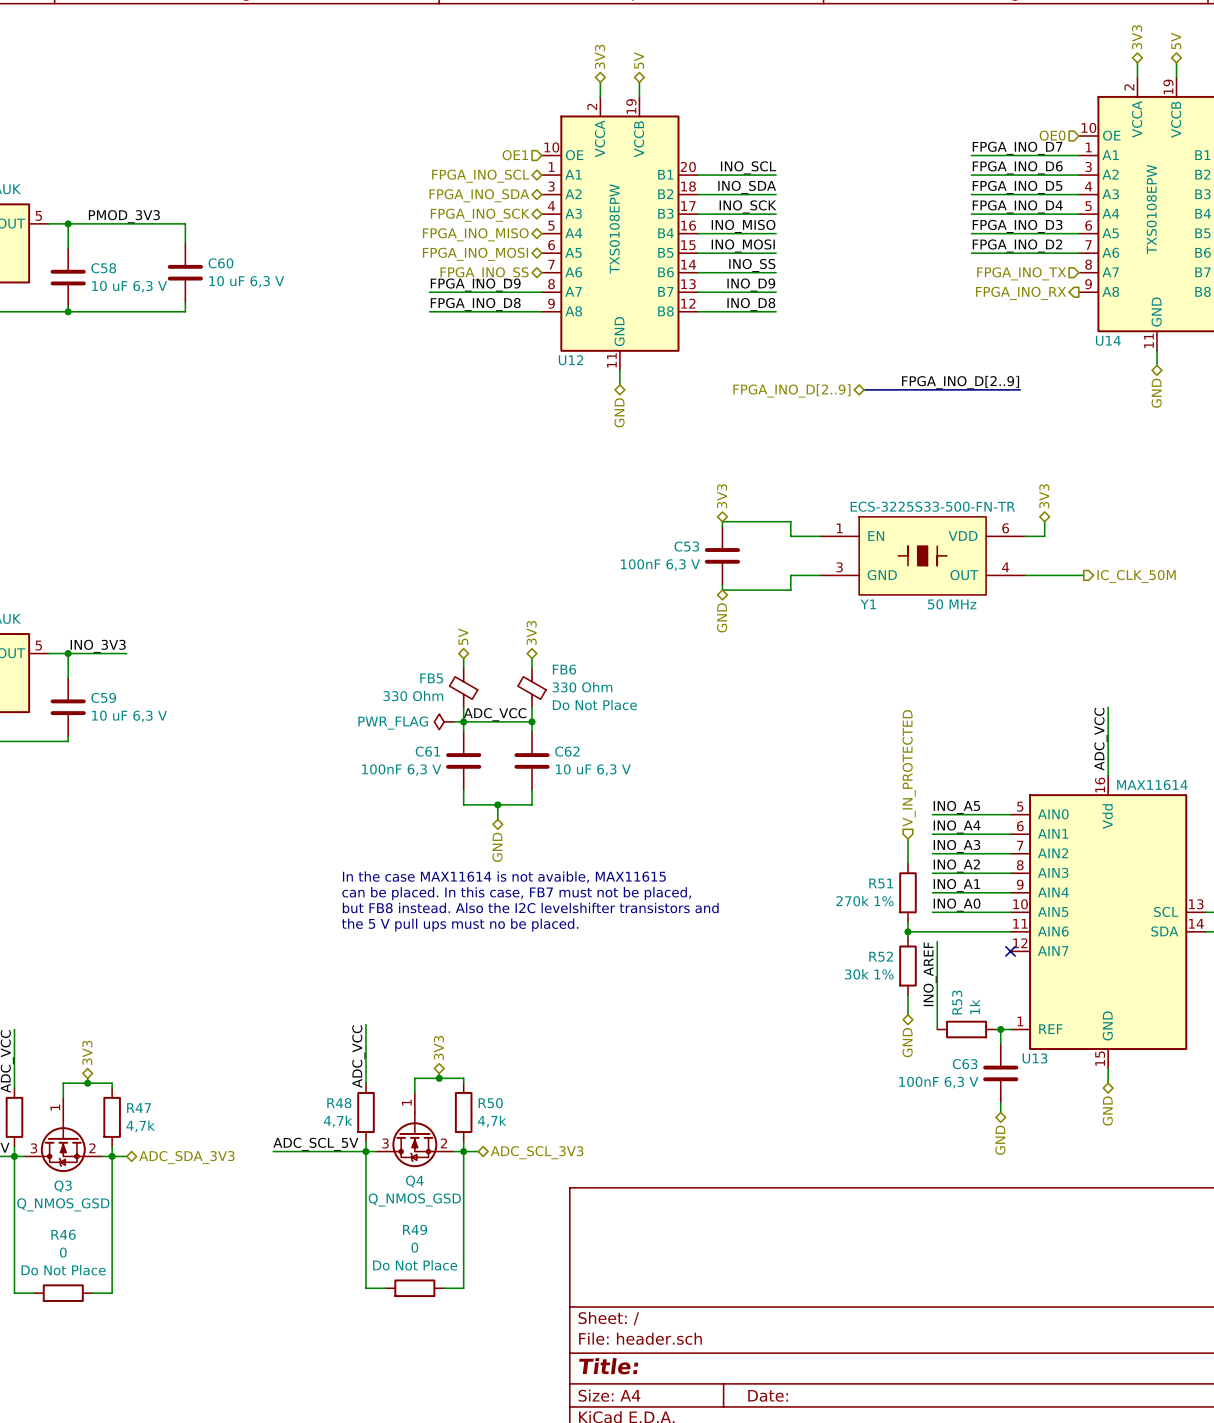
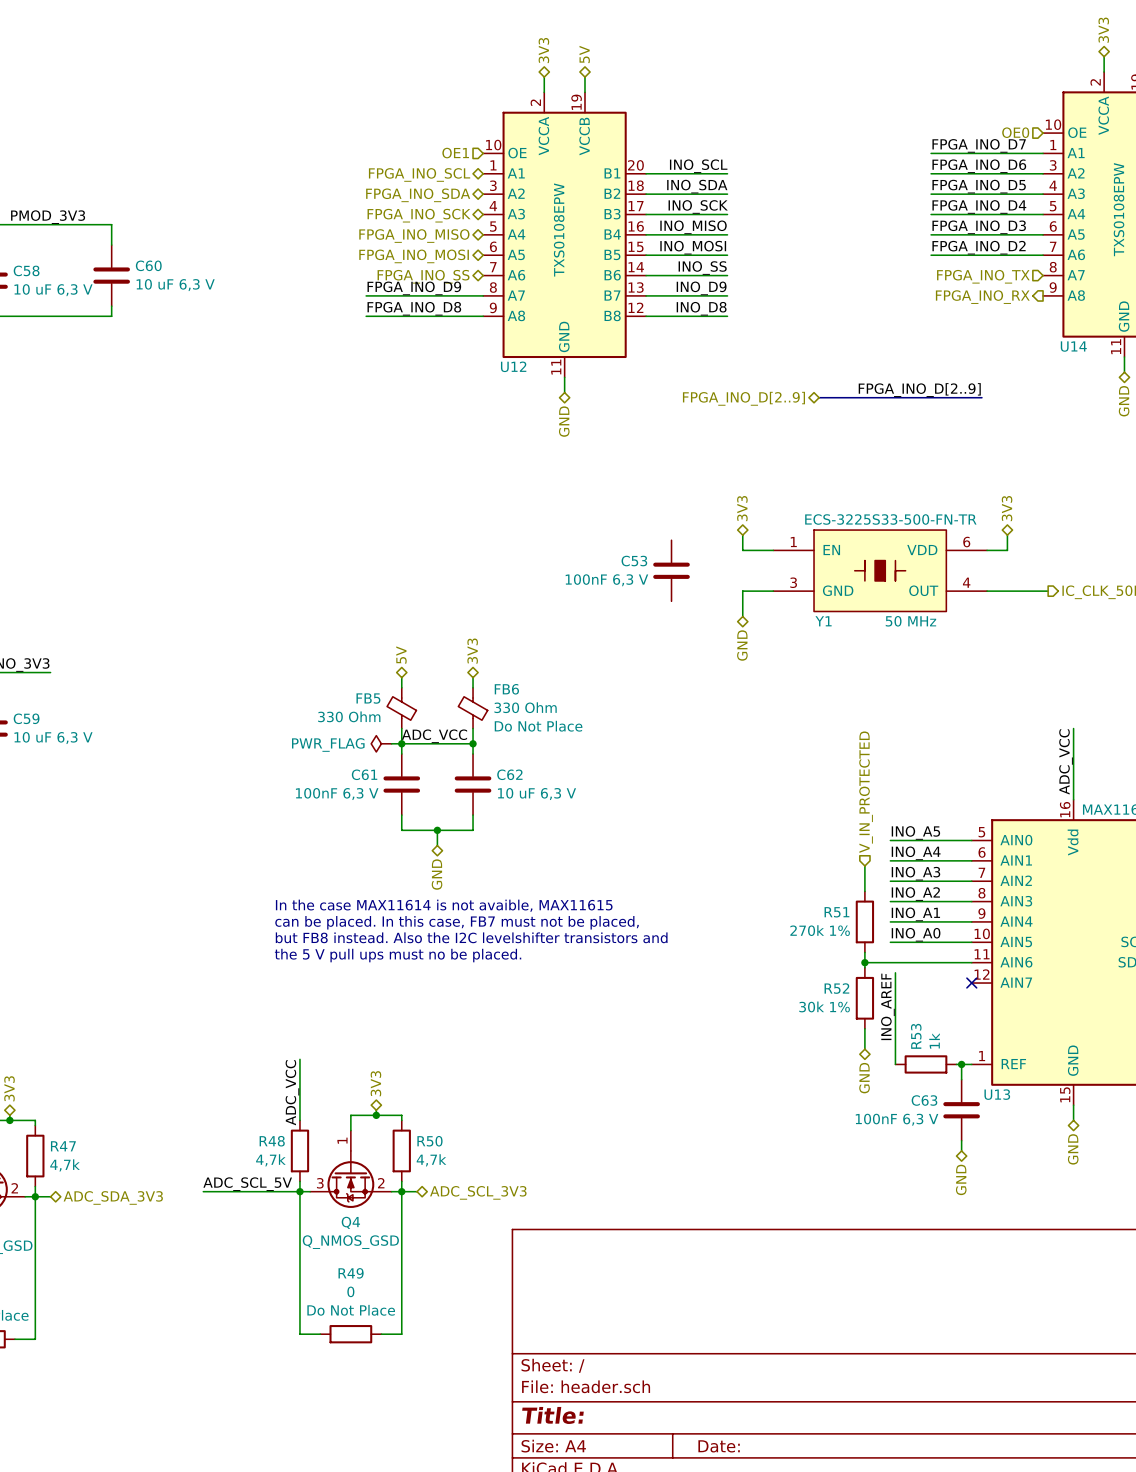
hierarchical label position: 3V3 (722, 496) -> 3V3 (742, 508)
wire: (790, 521) (722, 521) (722, 526) -> none
wire: (722, 585) (722, 590) (790, 590) -> (742, 616) (742, 606)
hierarchical label position: GND (722, 617) -> GND (742, 645)

